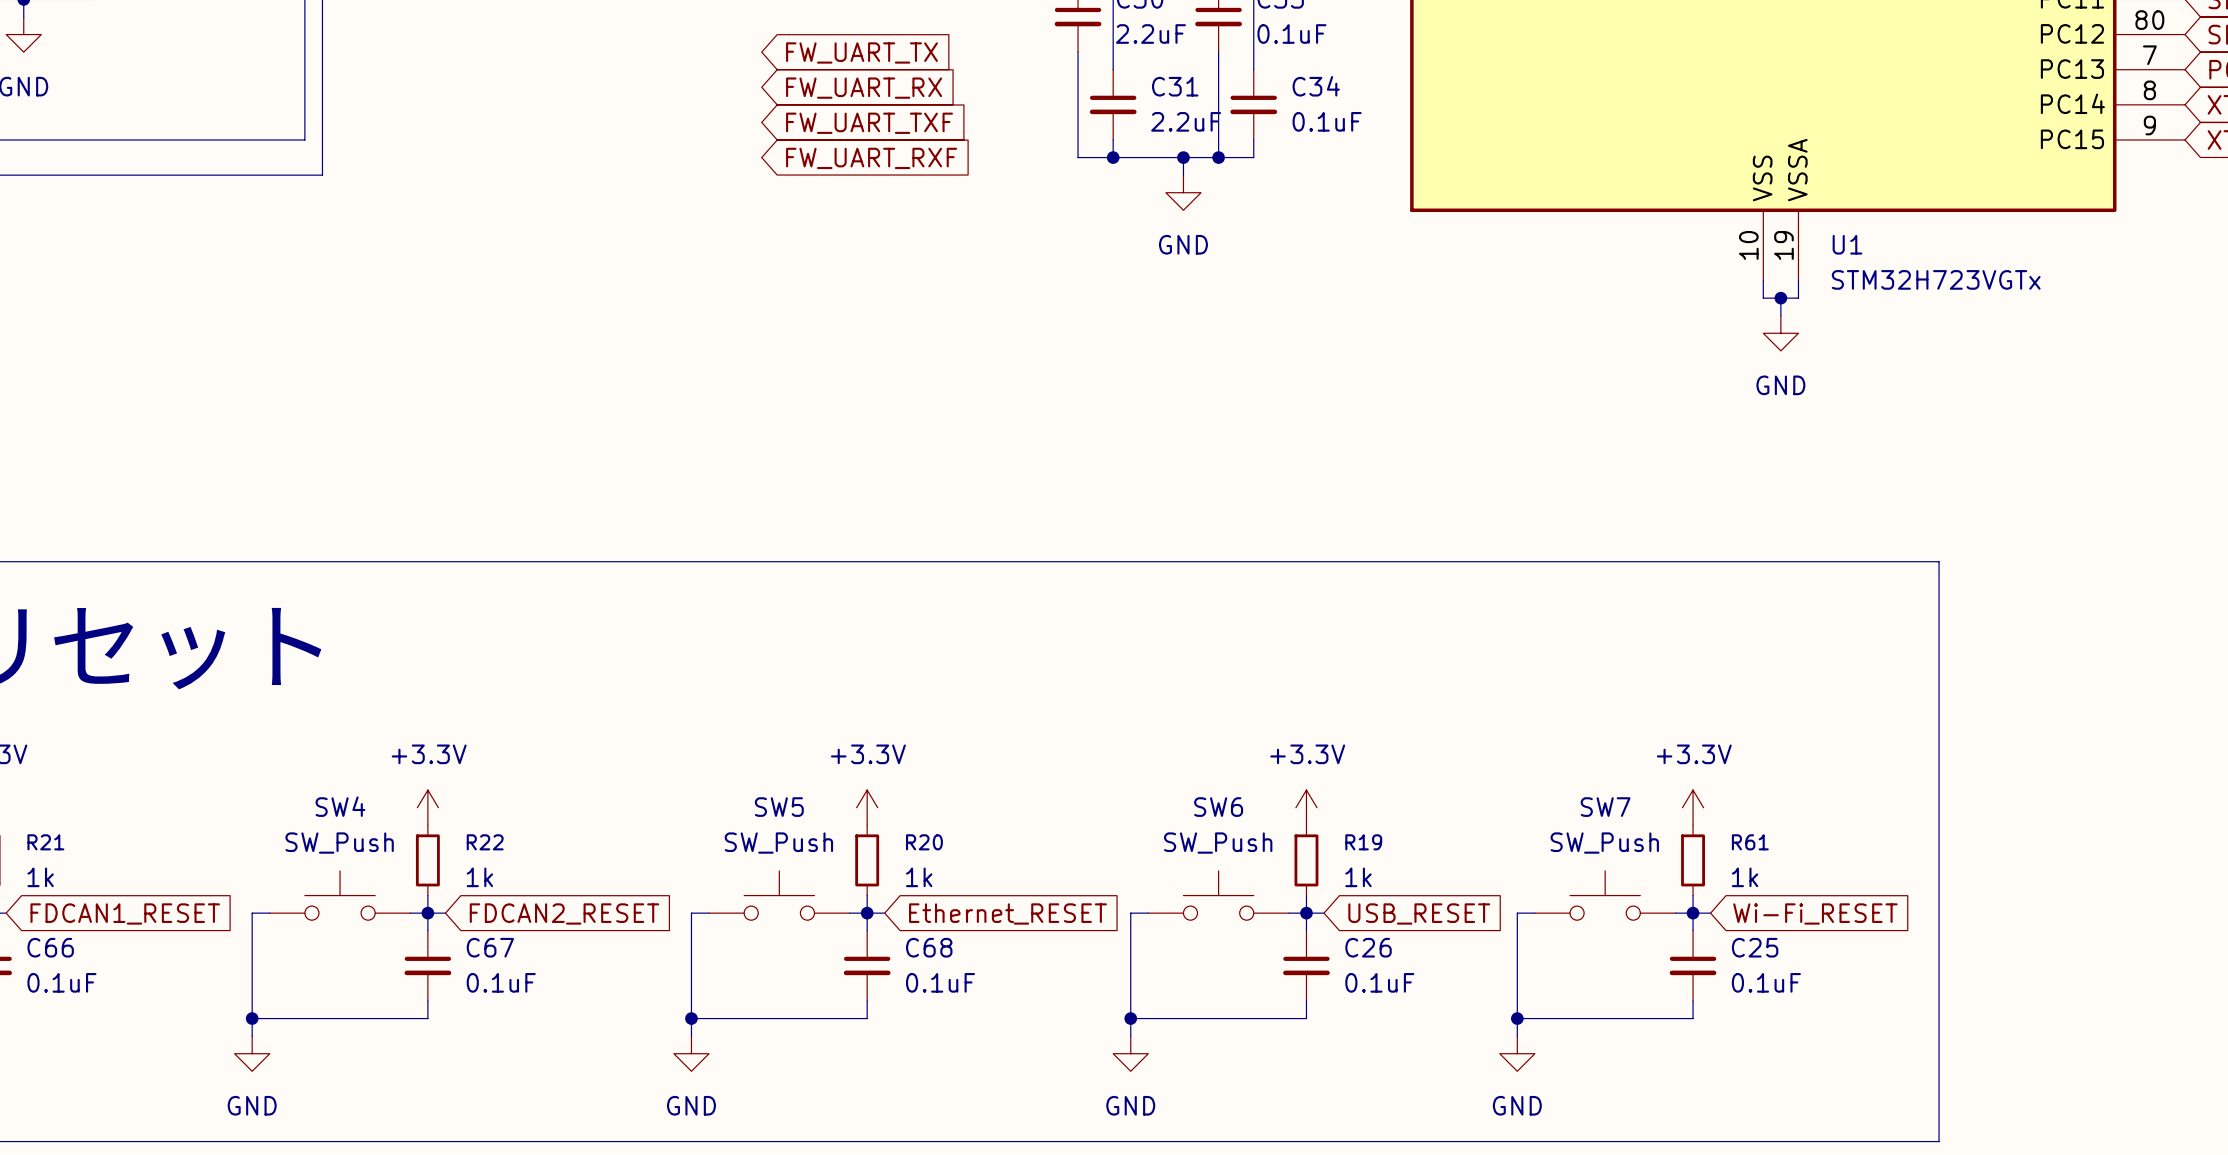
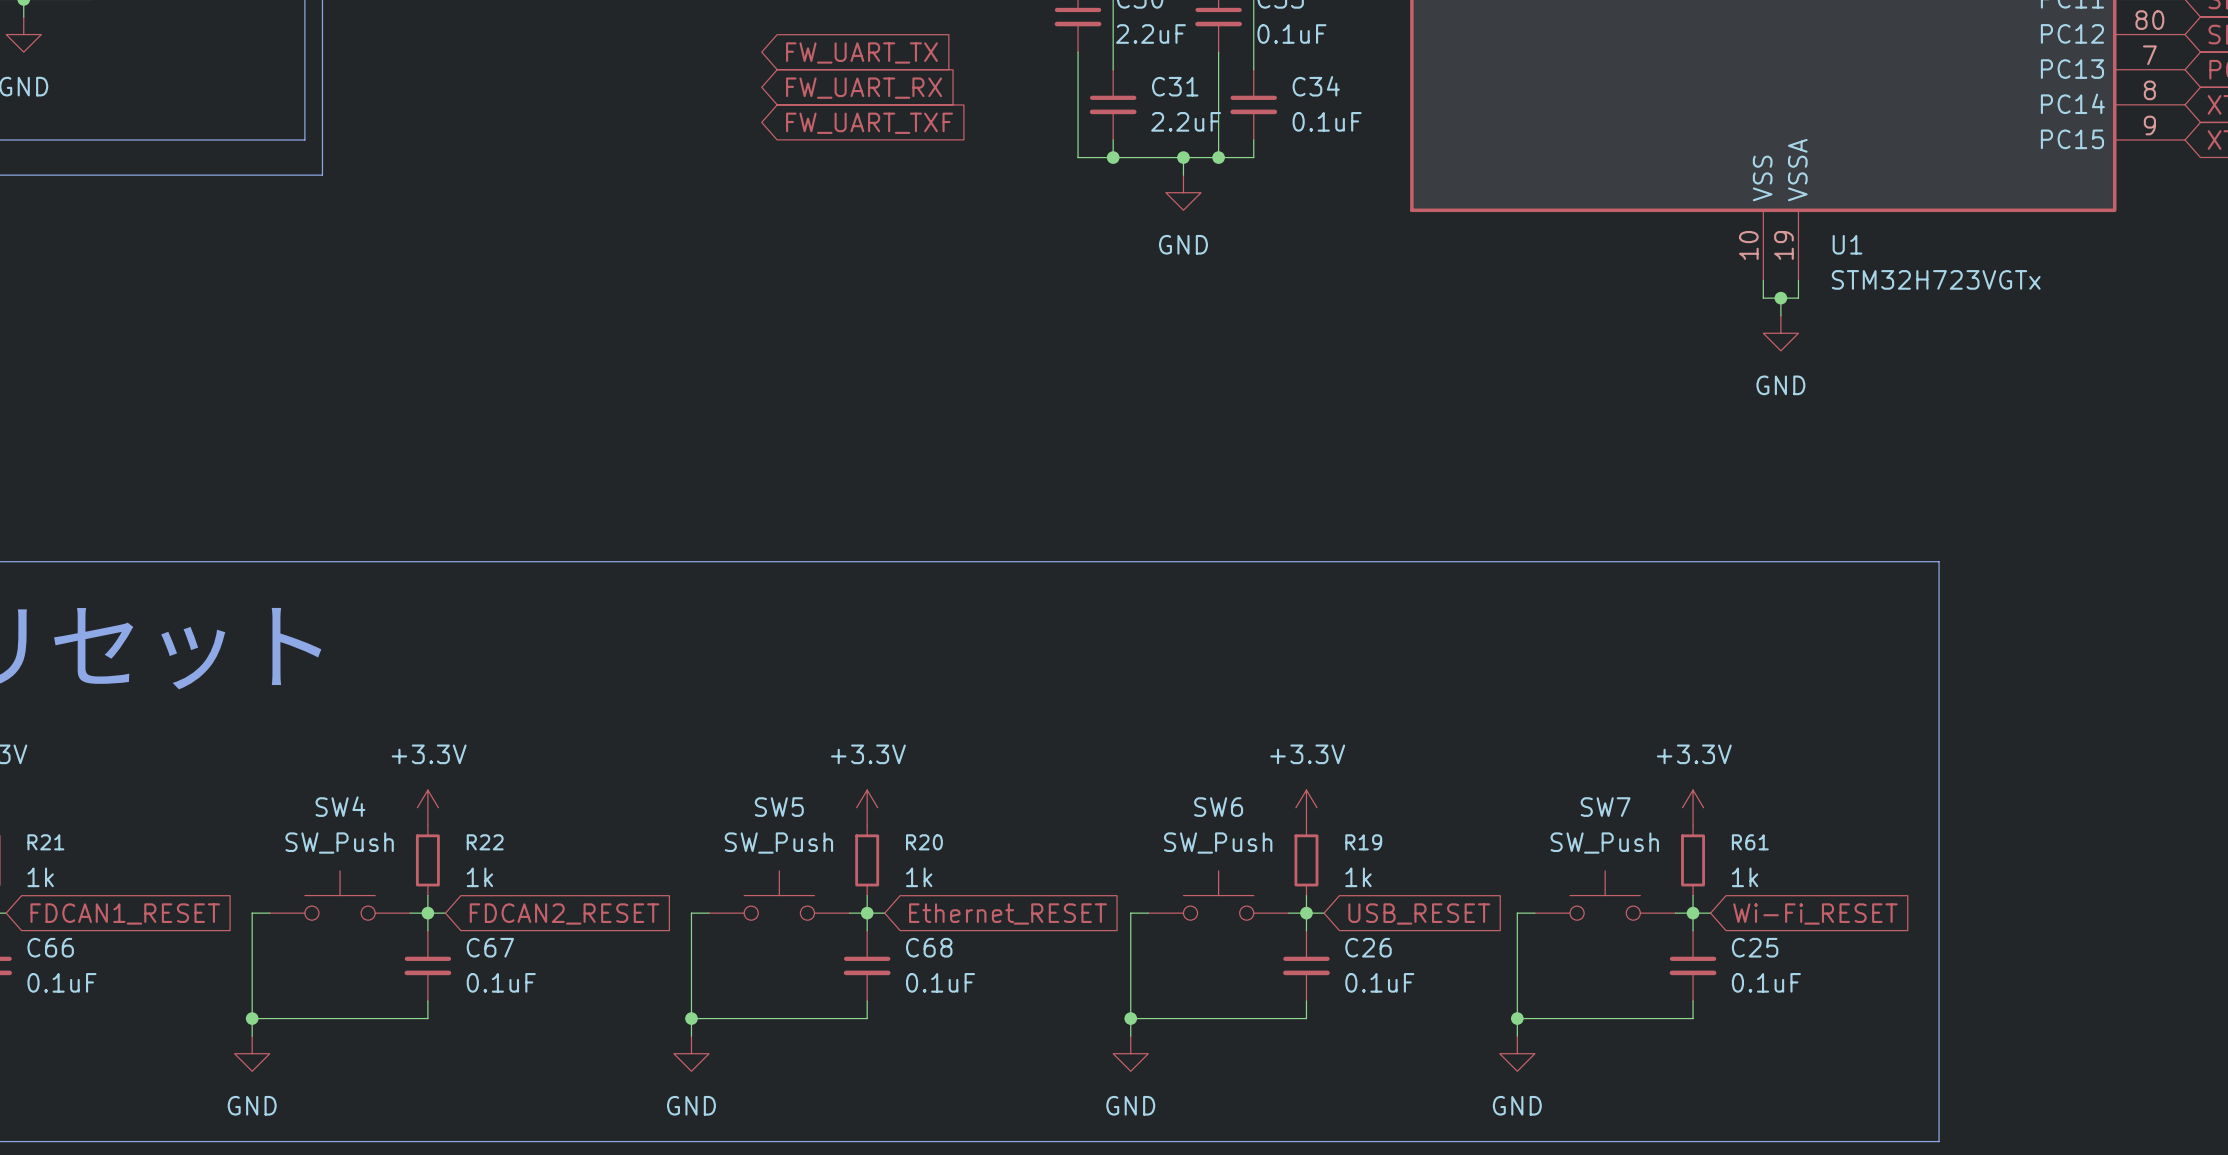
global label: FW_UART_RXF (871, 158) -> none

